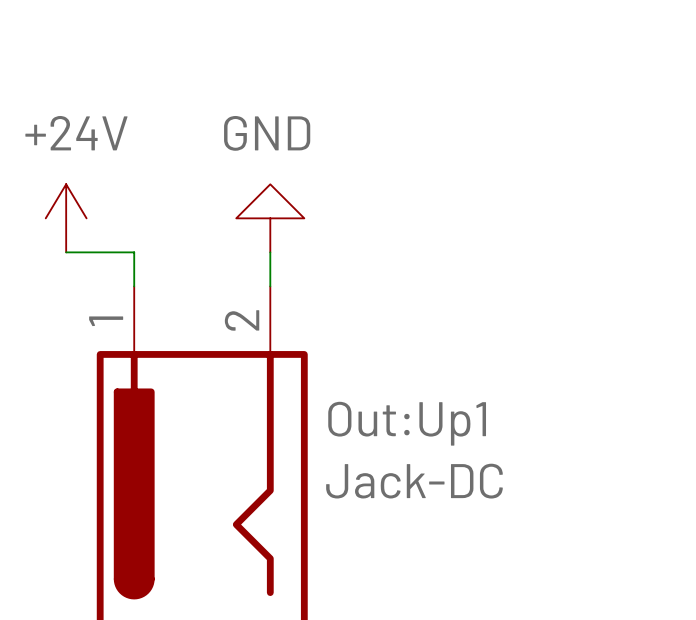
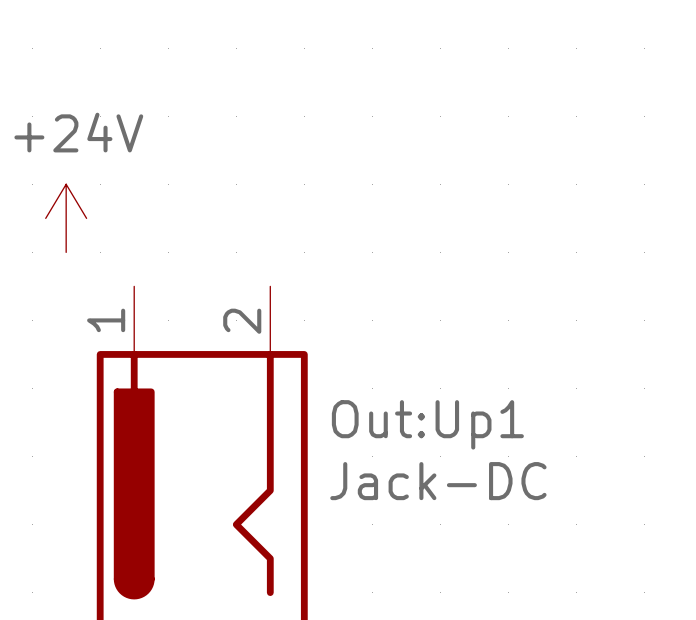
power symbol: GND (270, 218) -> none
wire: (66, 252) (134, 252) (134, 286) -> none
wire: (270, 252) (270, 286) -> none

